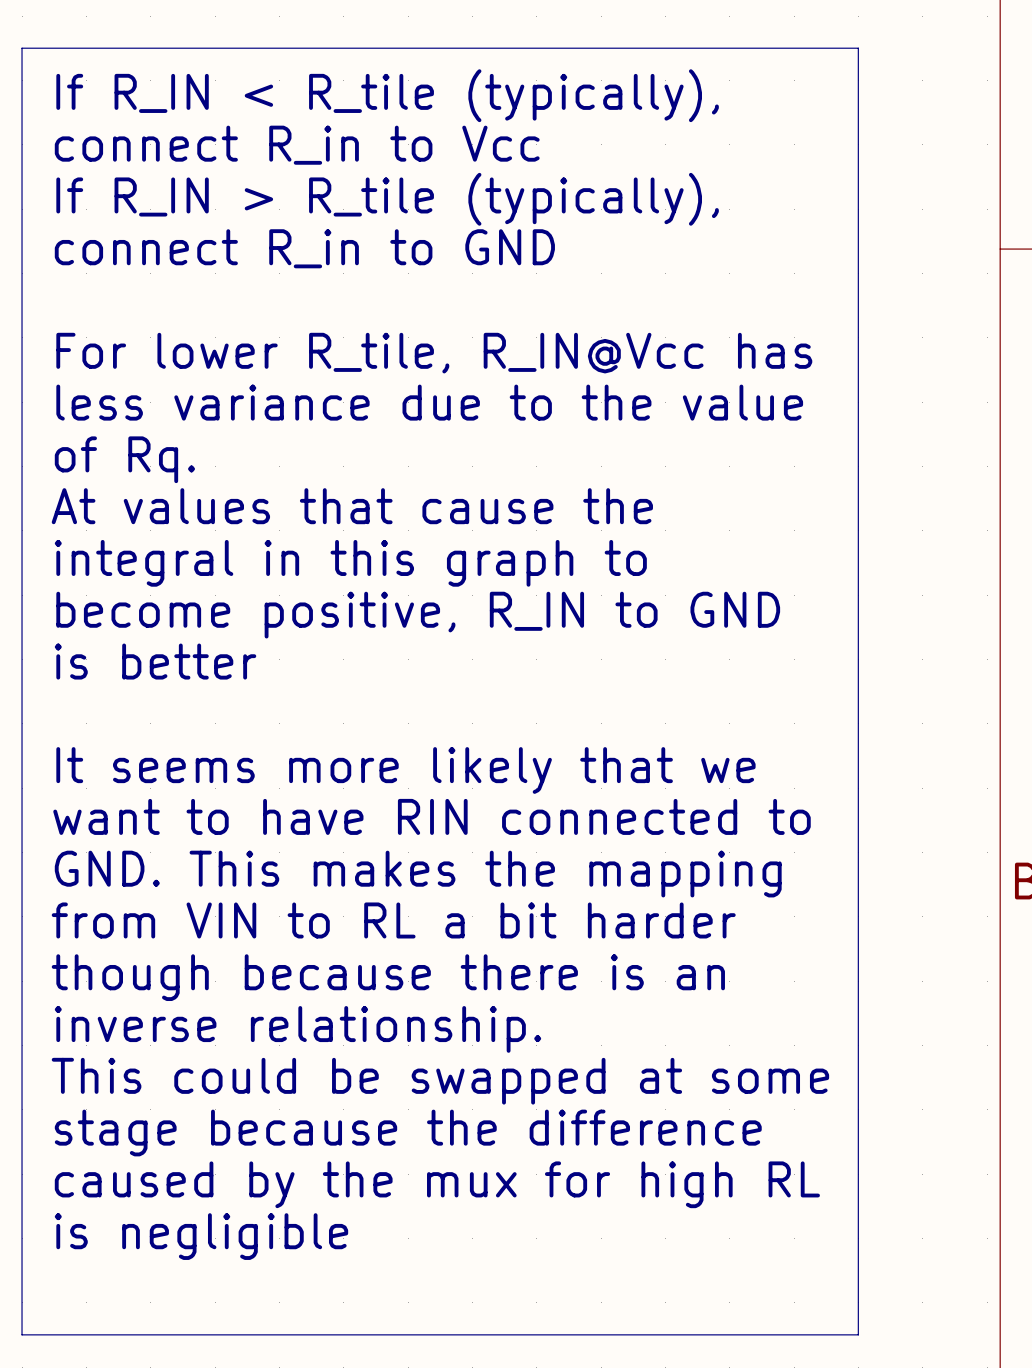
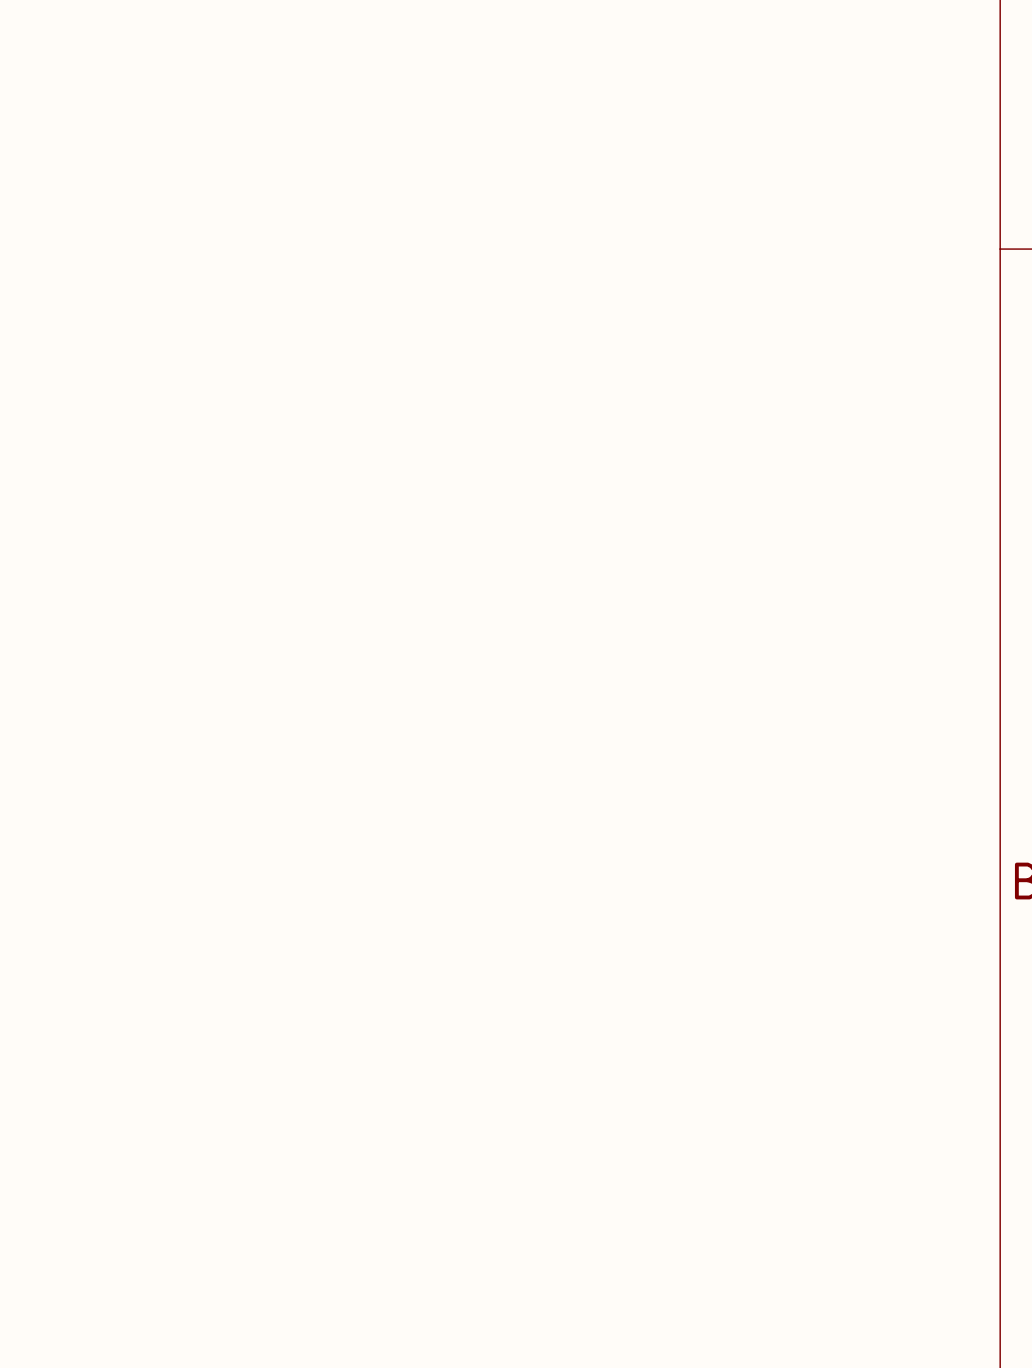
line: (22, 48) (858, 48) (858, 1334) (22, 1334) (22, 48) -> none
text: If R_IN < R_tile (typically), (387, 95) -> none
text: connect R_in to Vcc (297, 145) -> none
text: If R_IN > R_tile (typically), (387, 199) -> none
text: connect R_in to GND (304, 248) -> none
text: For lower R_tile, R_IN@Vcc has (434, 353) -> none
text: less variance due to the value (429, 402) -> none
text: of Rq. (124, 459) -> none
text: At values that cause the (352, 506) -> none
text: integral in this graph to (350, 563) -> none
text: become positive, R_IN to GND (418, 615) -> none
text: is better (155, 661) -> none
text: It seems more likely that we (405, 770) -> none
text: want to have RIN connected to (432, 816) -> none
text: GND. This makes the mapping (418, 874) -> none
text: from VIN to RL a bit harder (393, 920) -> none
text: though because there is an (388, 977) -> none
text: inverse relationship. (297, 1029) -> none
text: This could be swapped at some (440, 1081) -> none
text: stage because the difference (408, 1133) -> none
text: caused by the mux for high RL (437, 1184) -> none
text: is negligible (201, 1236) -> none

